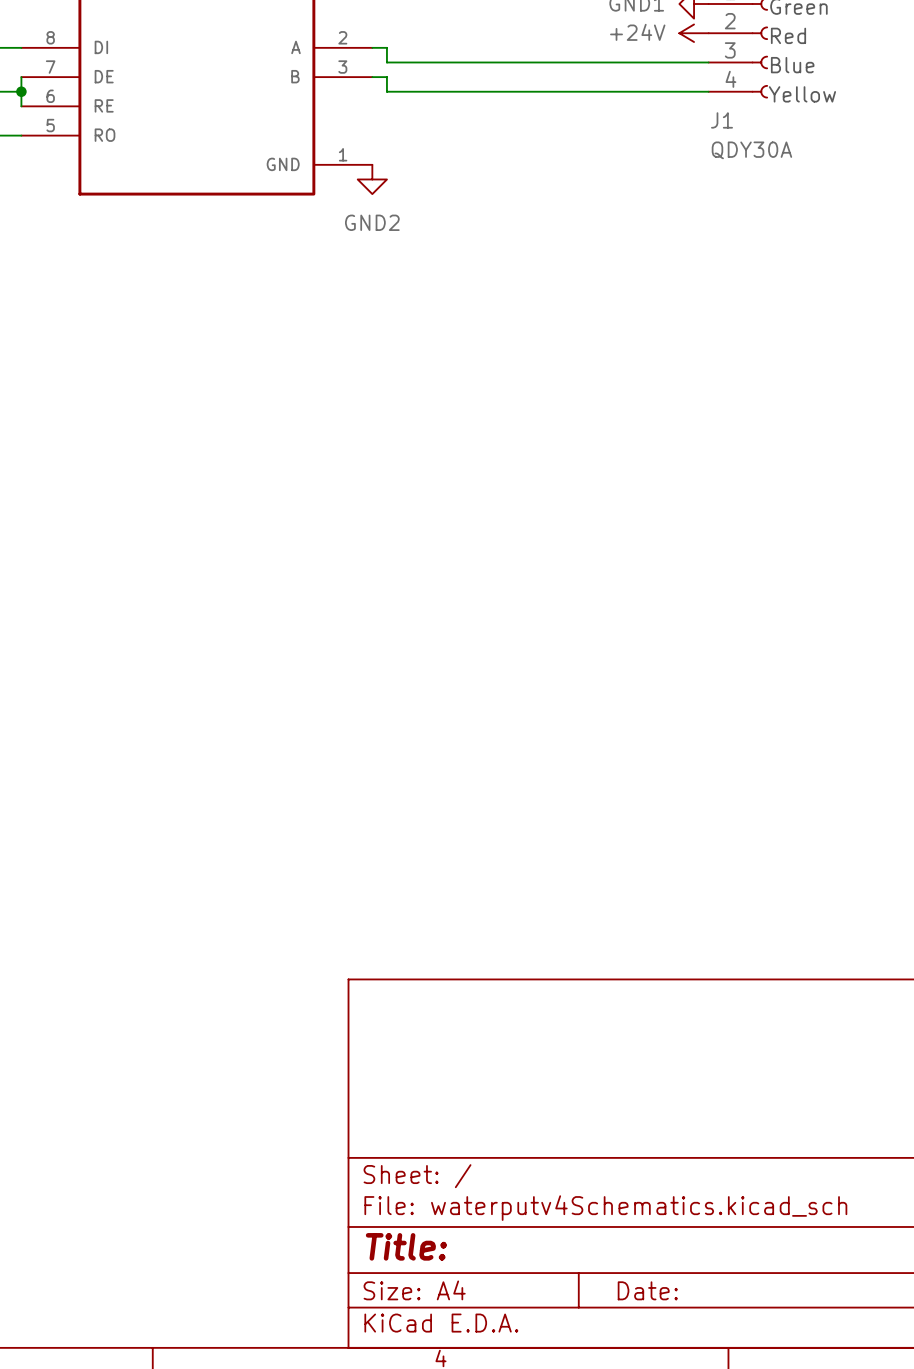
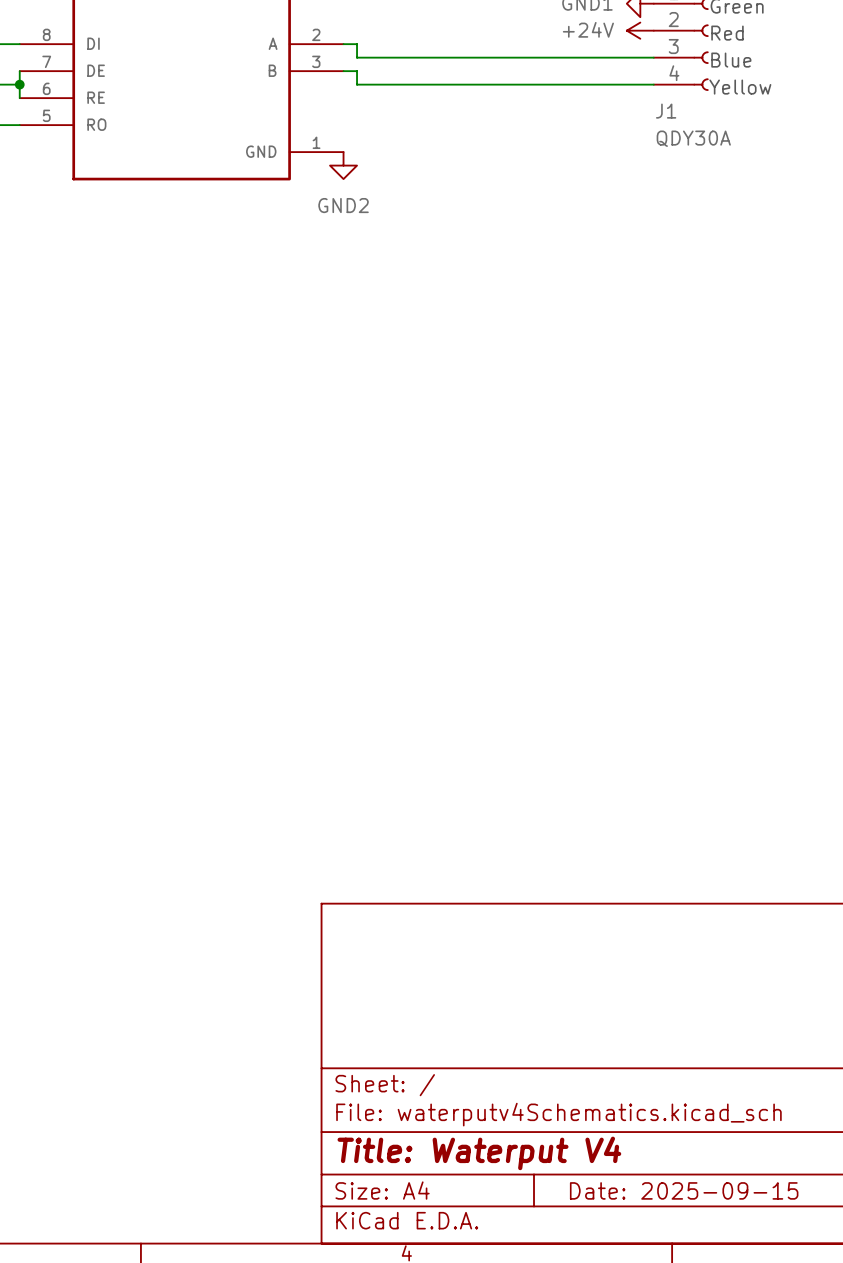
title block: Title: (406, 1246) -> Title: Waterput V4 (479, 1153)
title block: Date: (647, 1290) -> Date: 2025-09-15 (684, 1190)

